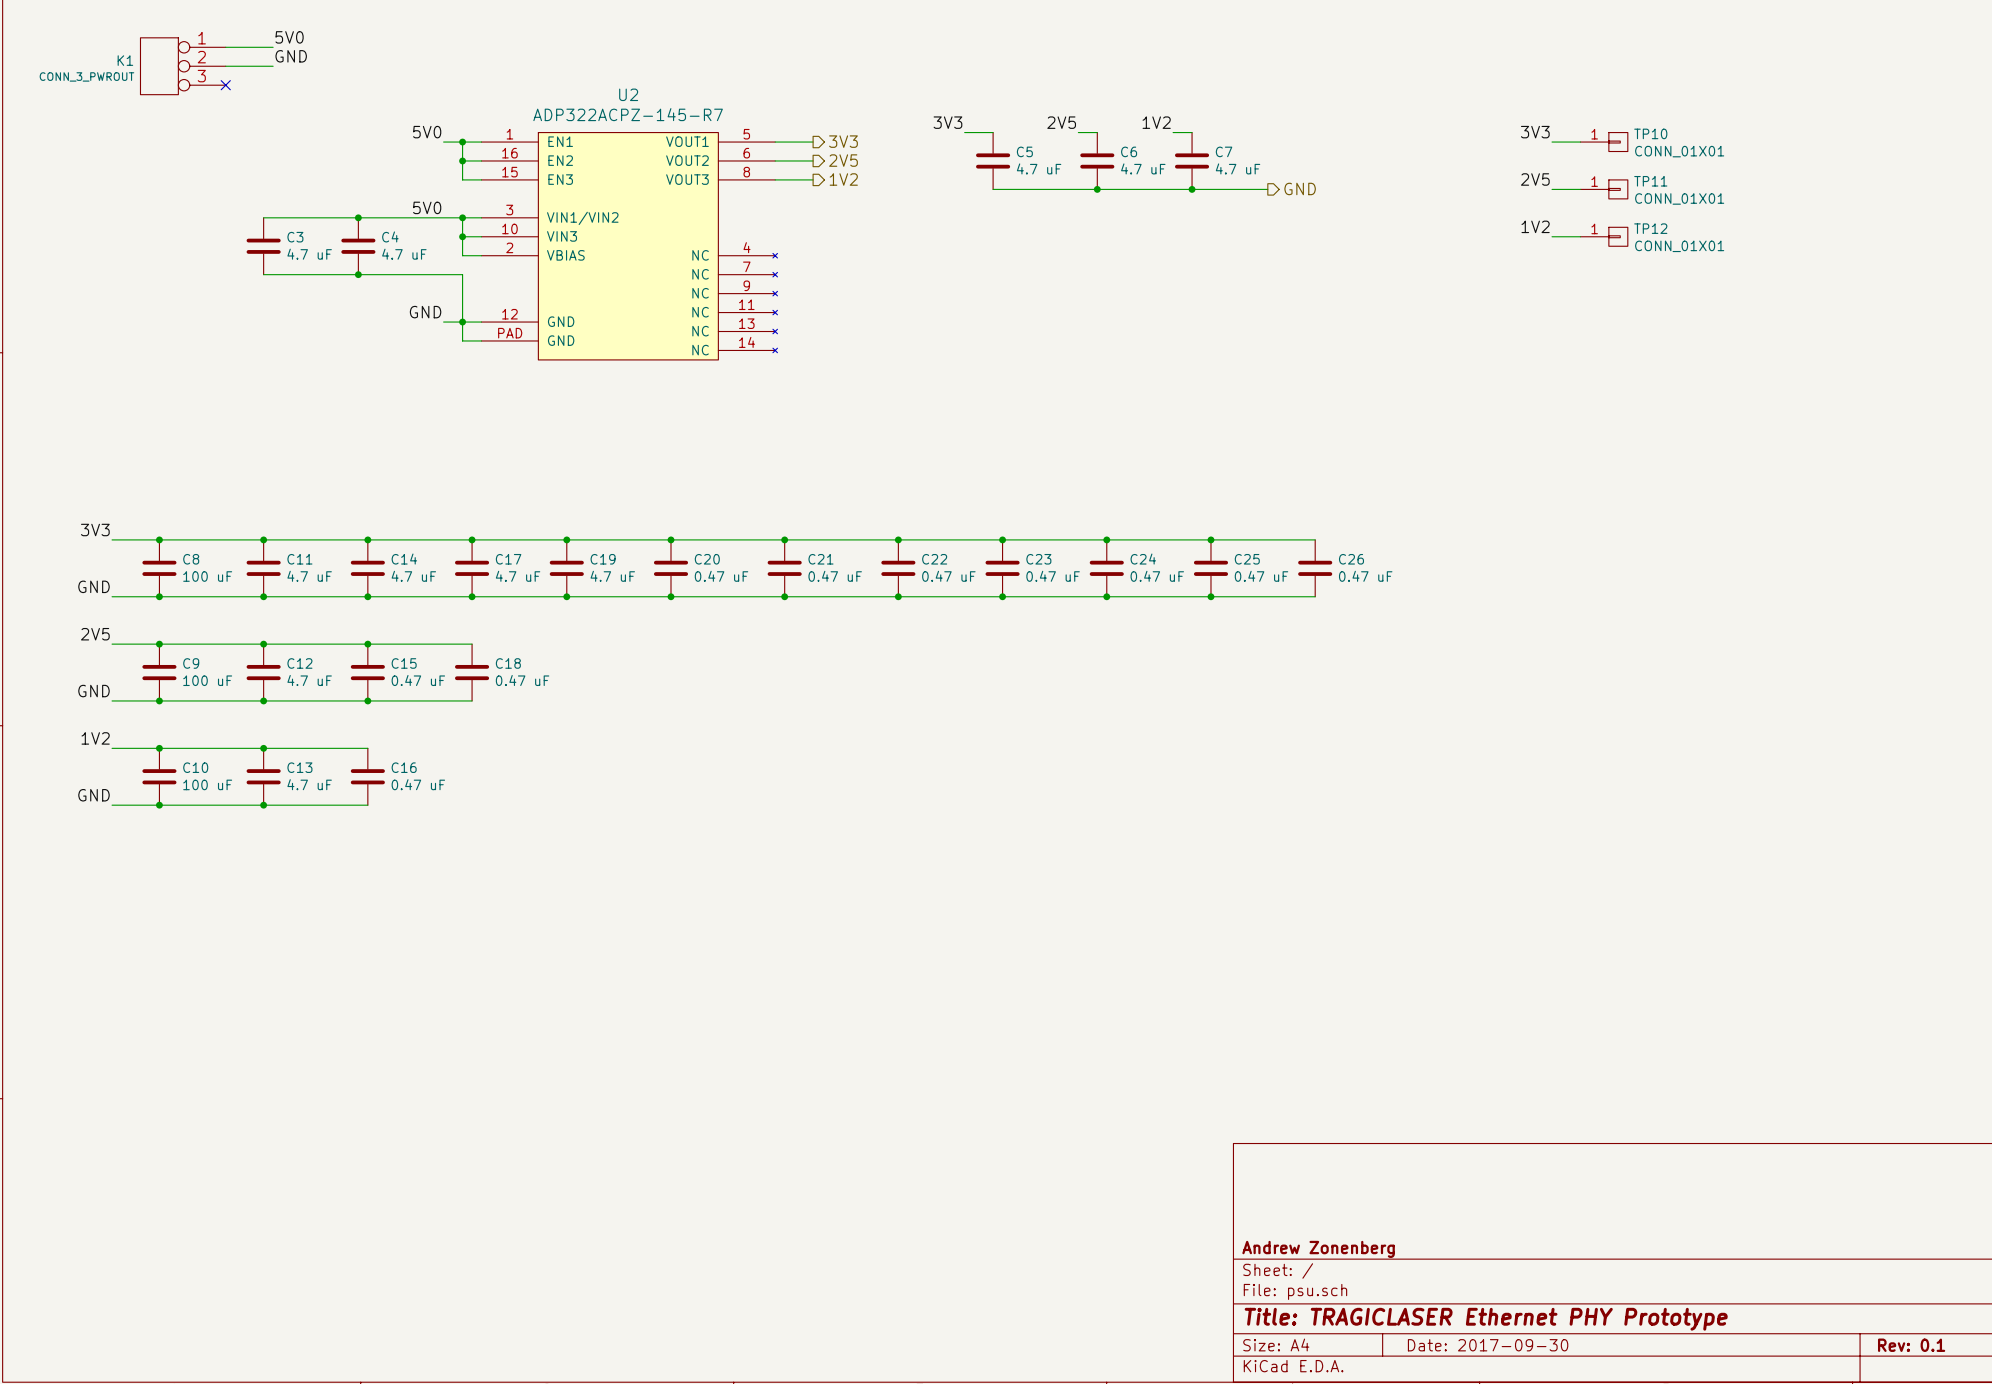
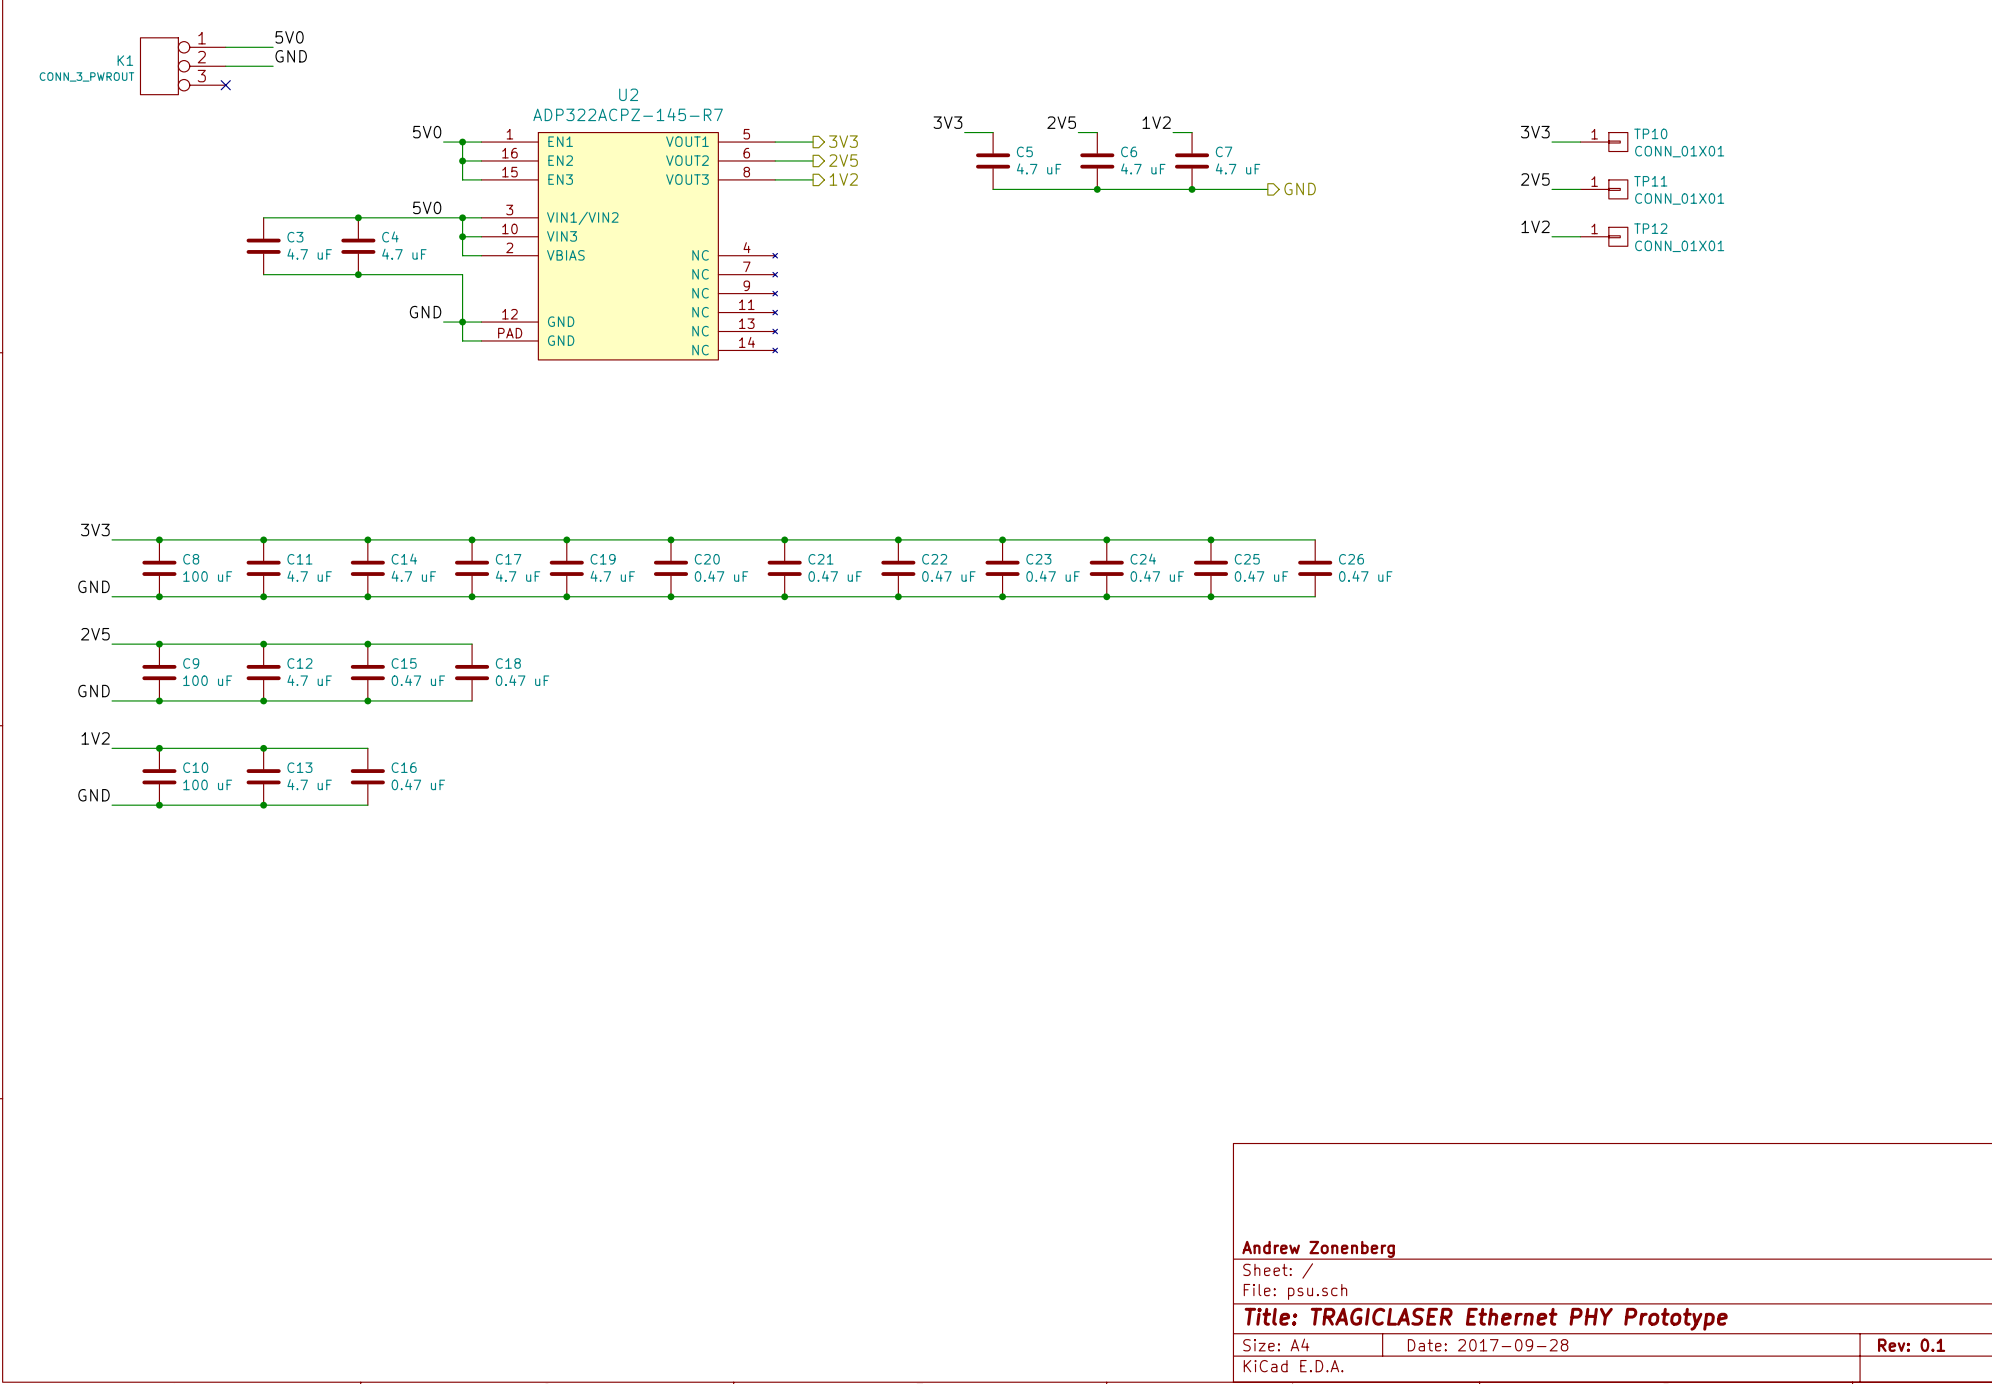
title block: Date: 2017-09-30 (1488, 1345) -> Date: 2017-09-28 (1488, 1345)

